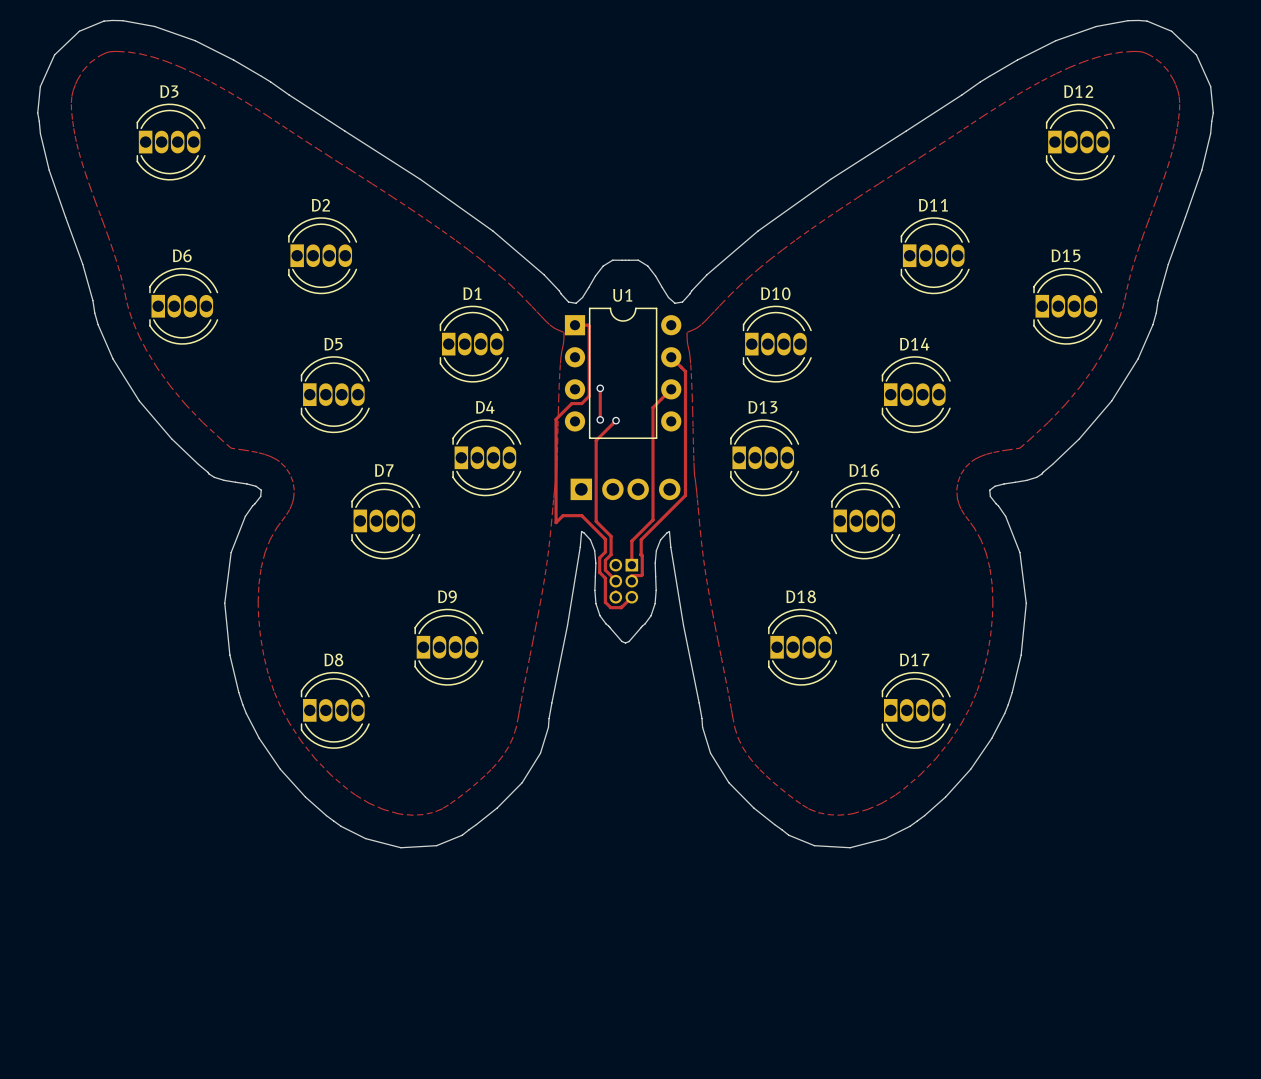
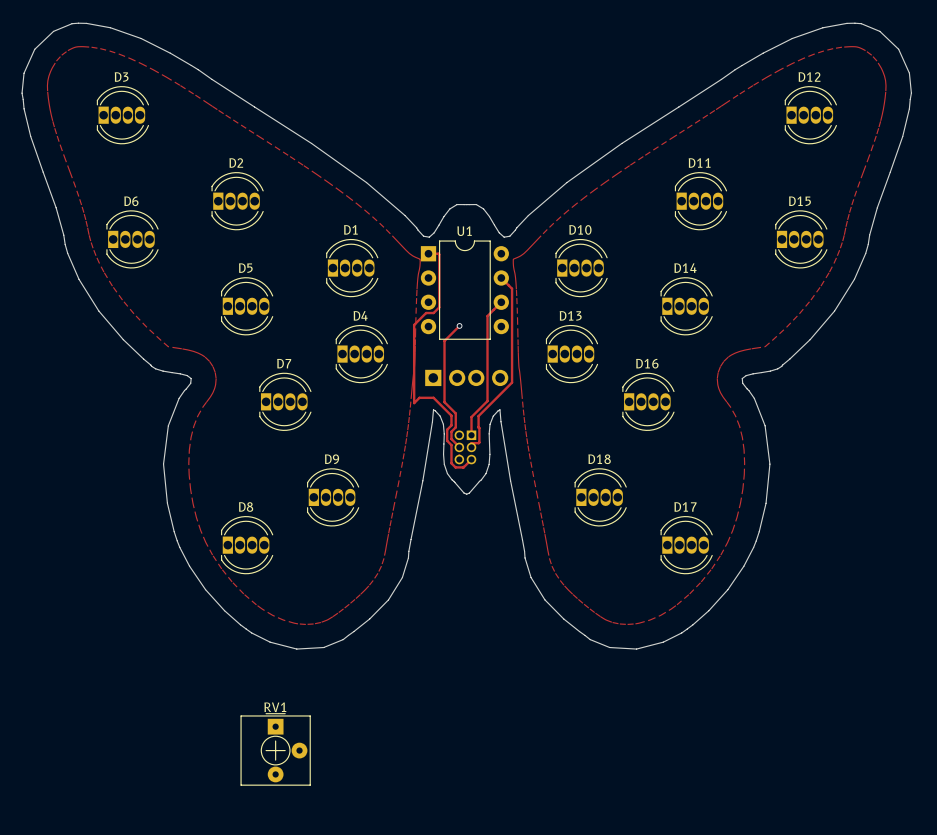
track: (600, 388) (600, 419) -> none
via: (600, 388) -> none
via: (600, 419) -> none
RV1: none -> (275, 749)

